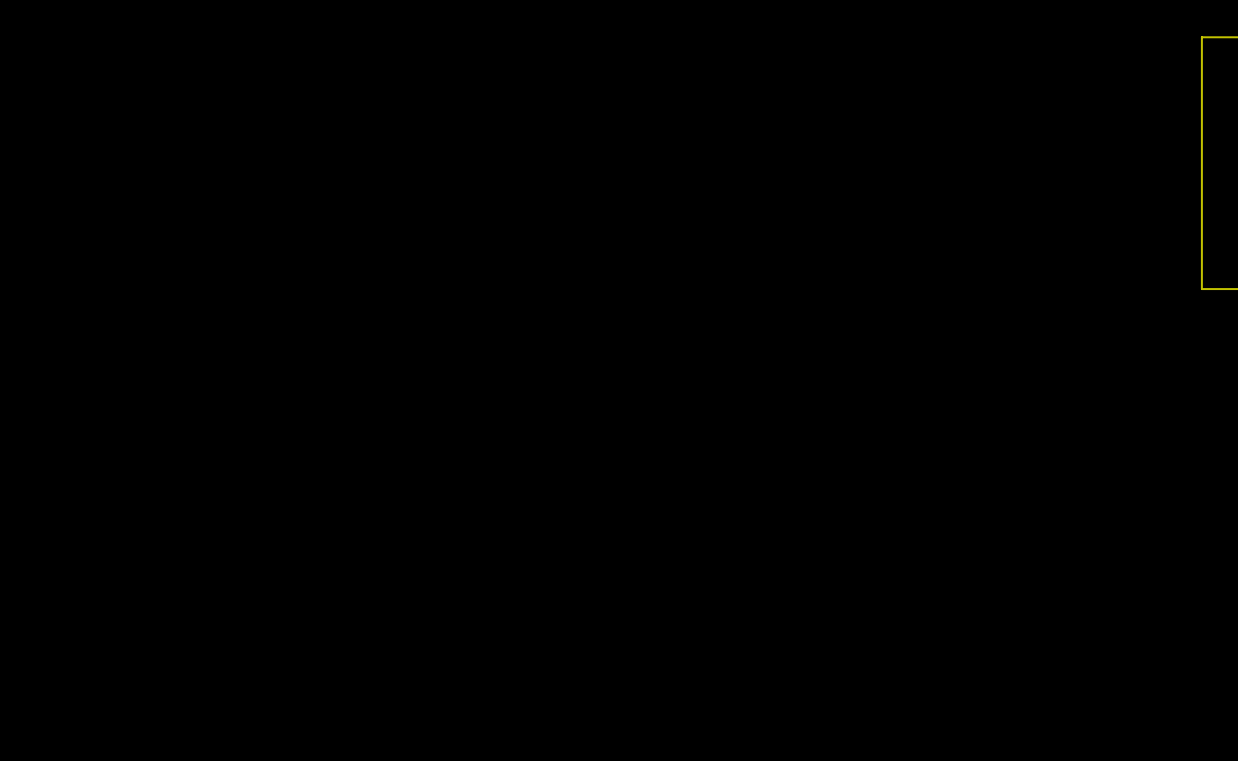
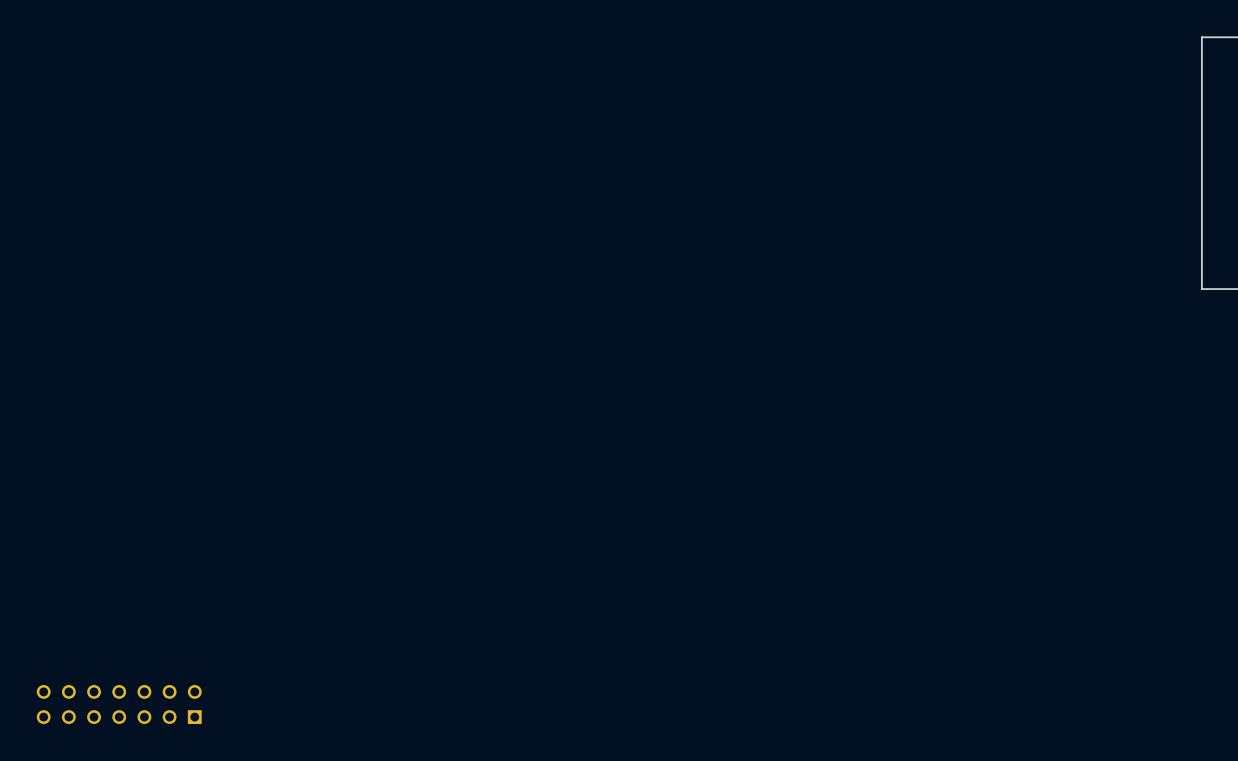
part: none -> (119, 704)

